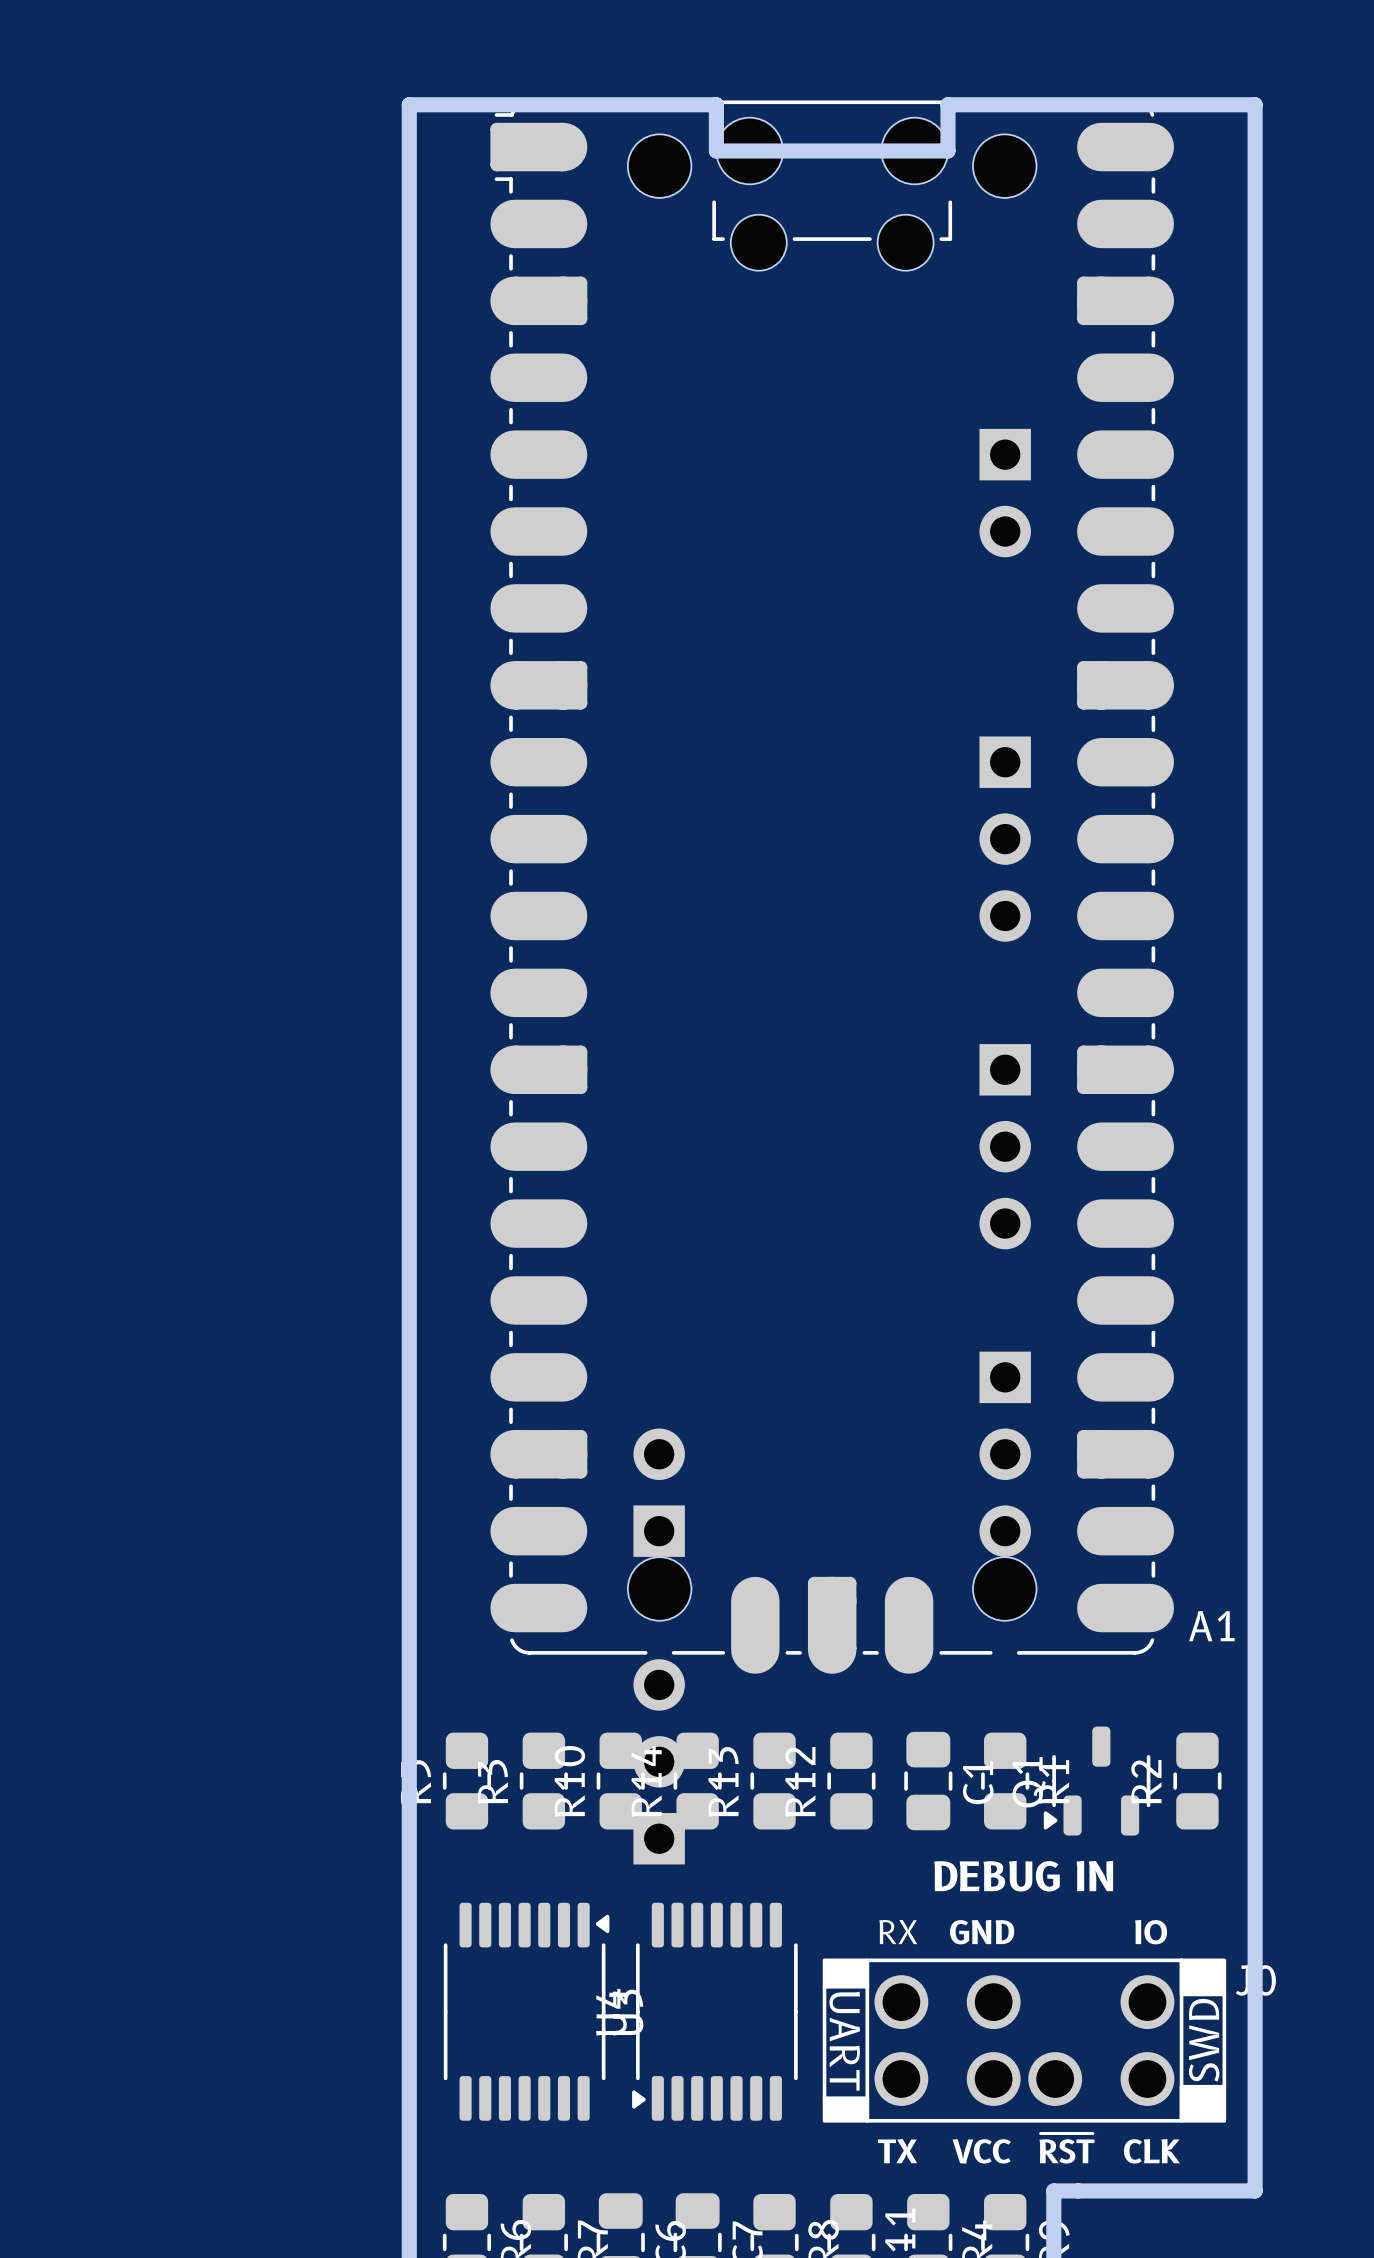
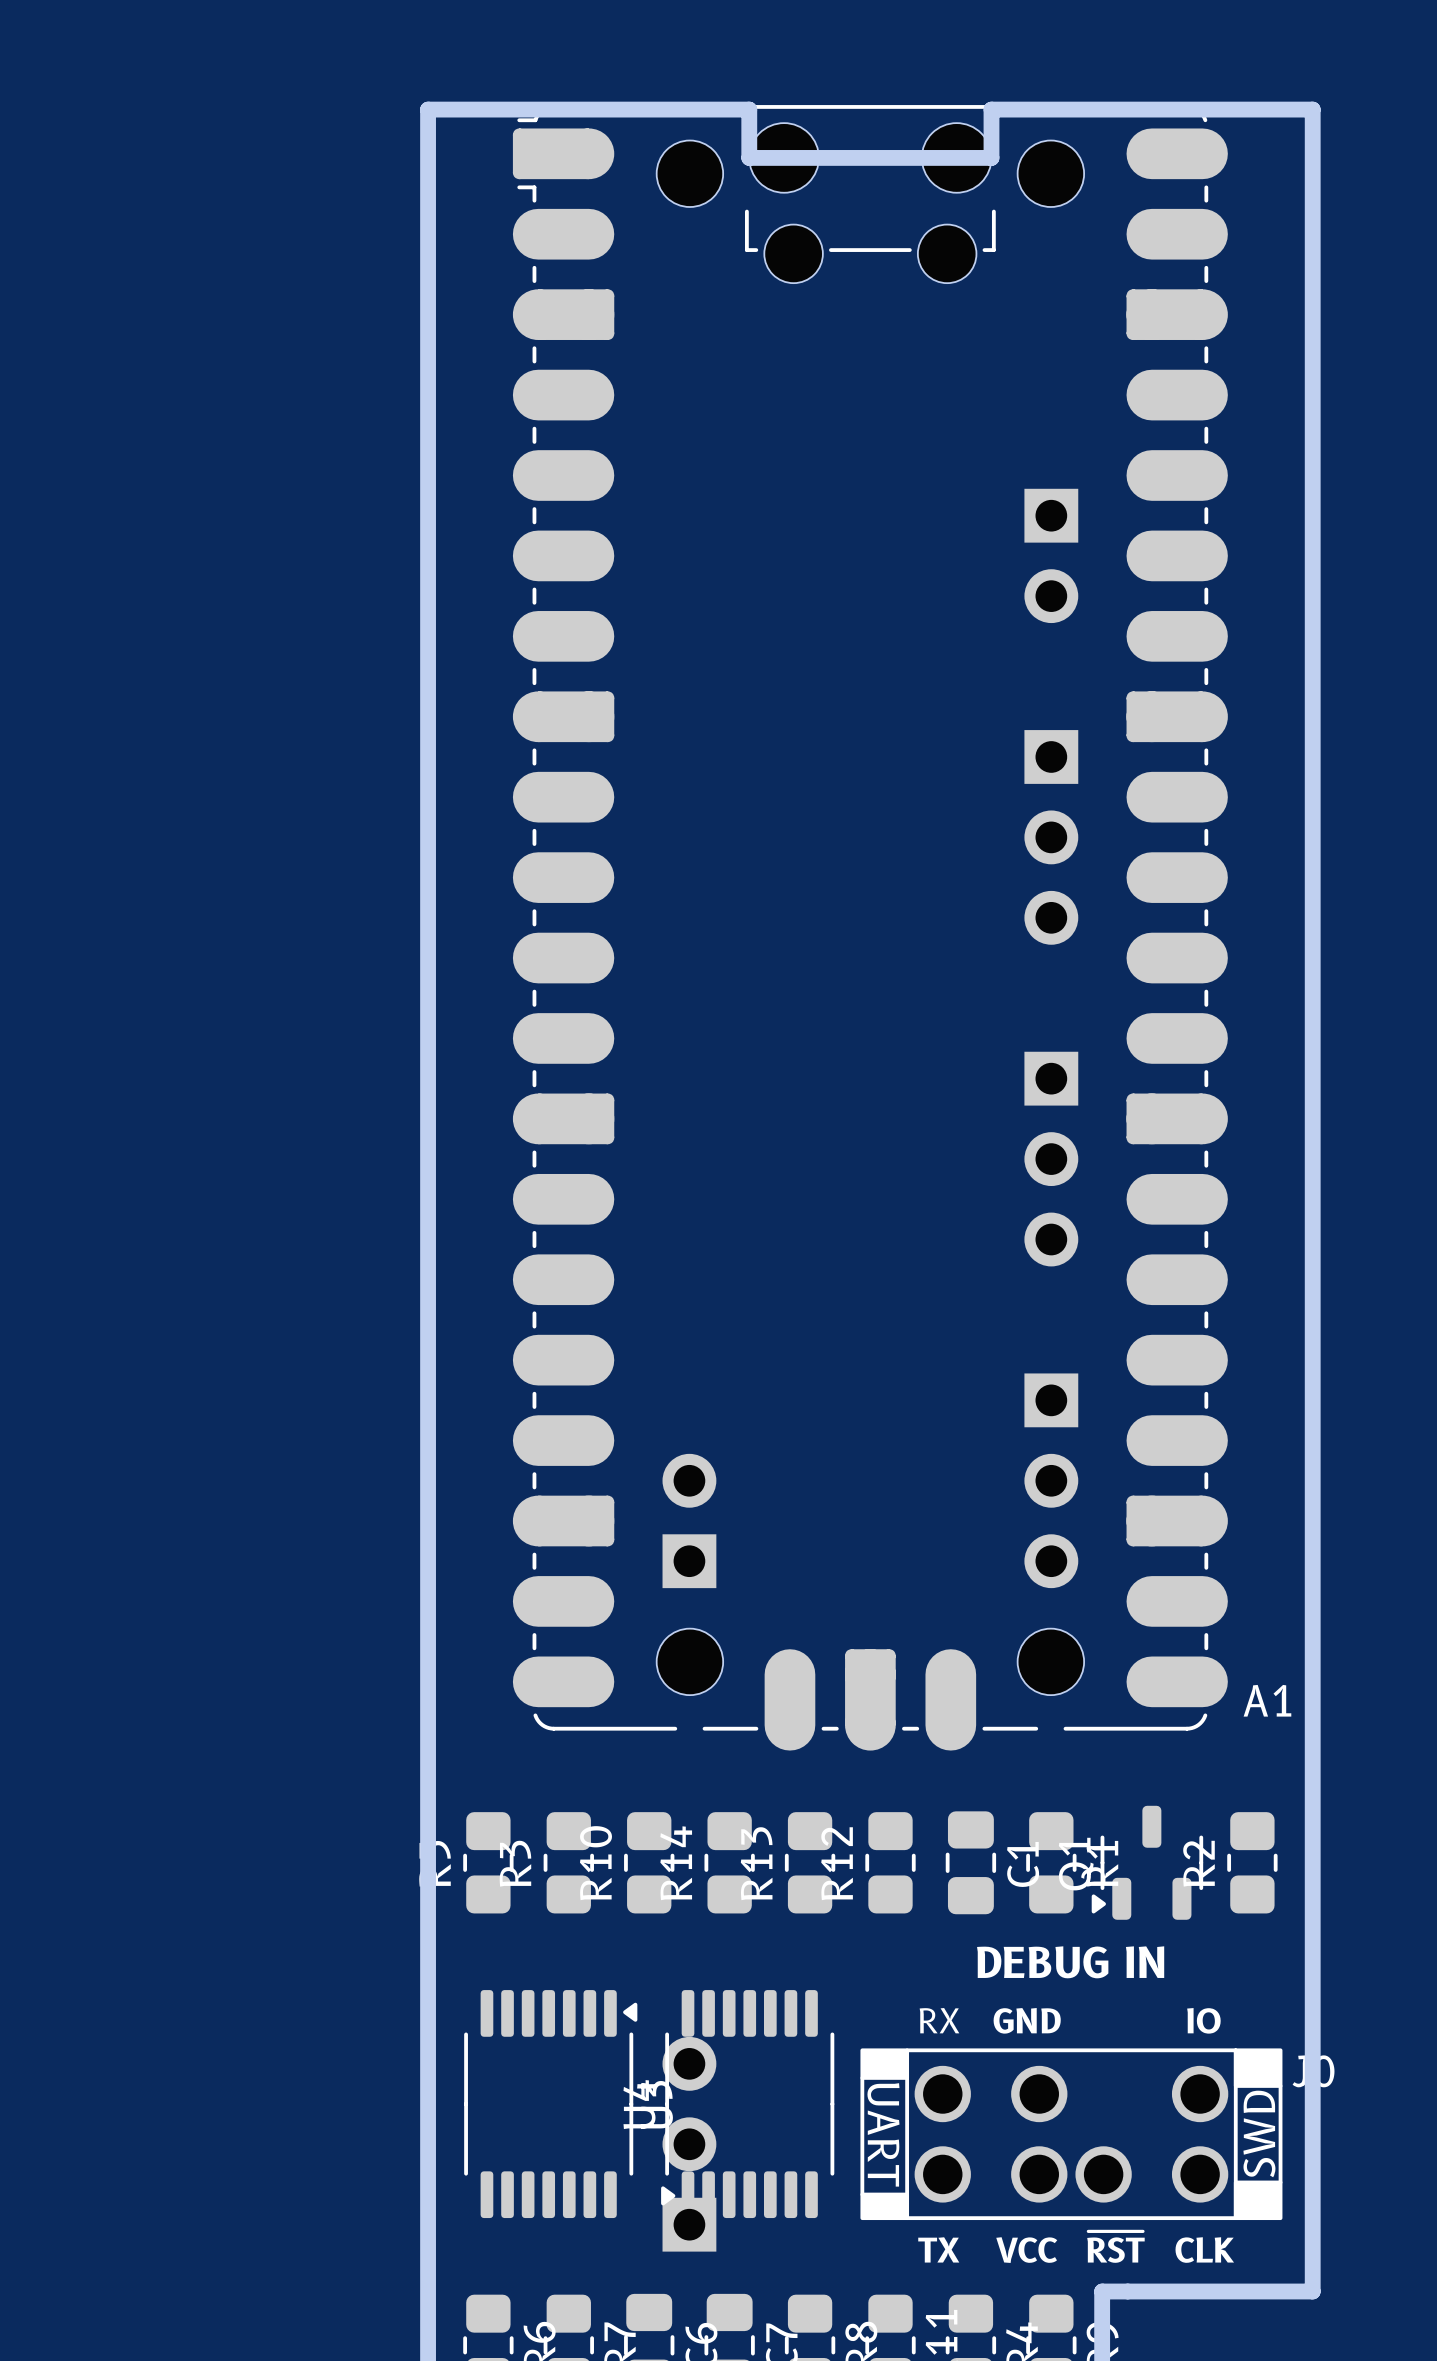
part position: (1005, 493) -> (1051, 555)
part position: (1005, 839) -> (1051, 837)
part position: (1005, 1146) -> (1051, 1159)
part position: (1005, 1454) -> (1051, 1480)
part position: (659, 1492) -> (689, 1520)
part: (659, 1761) -> none
part: none -> (689, 2144)

